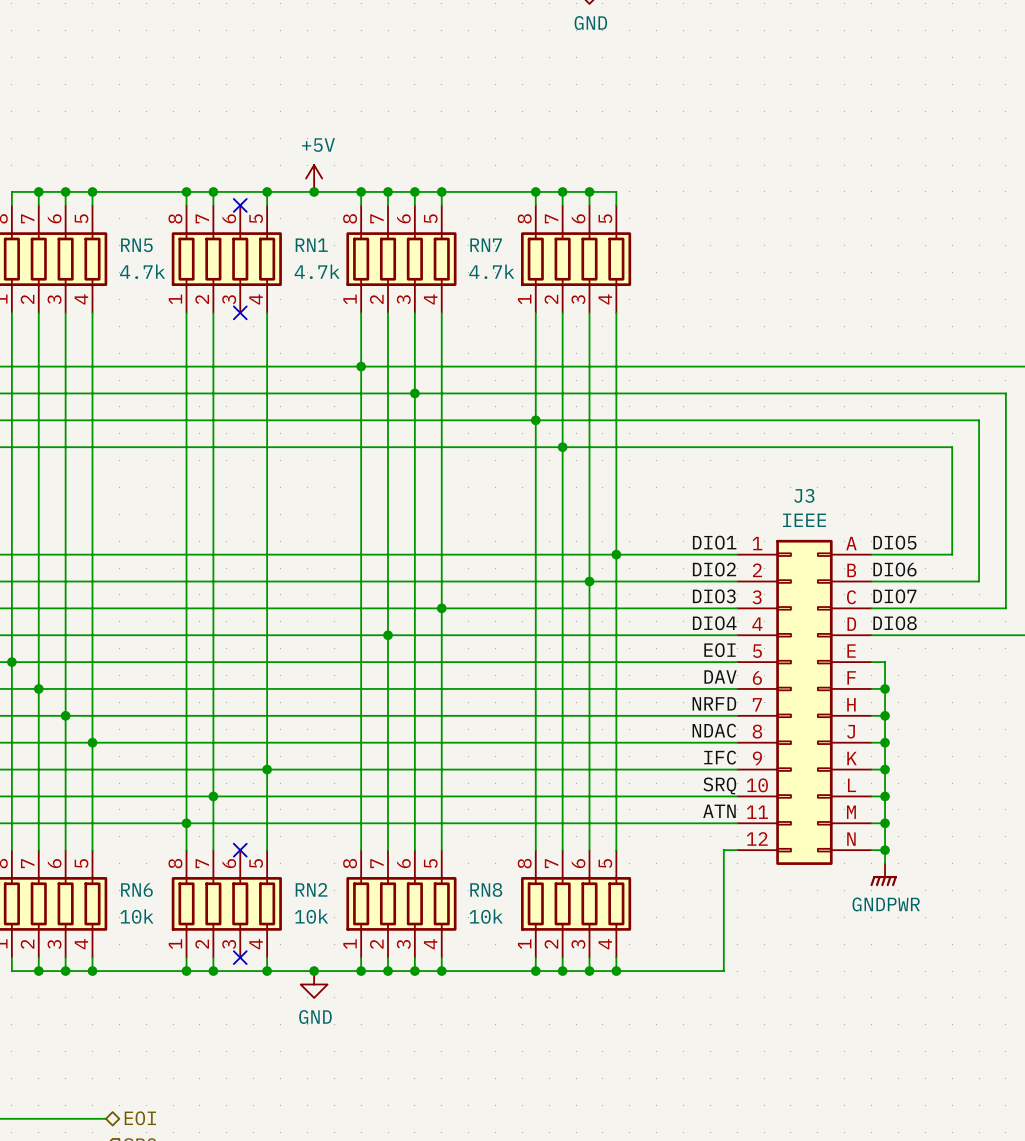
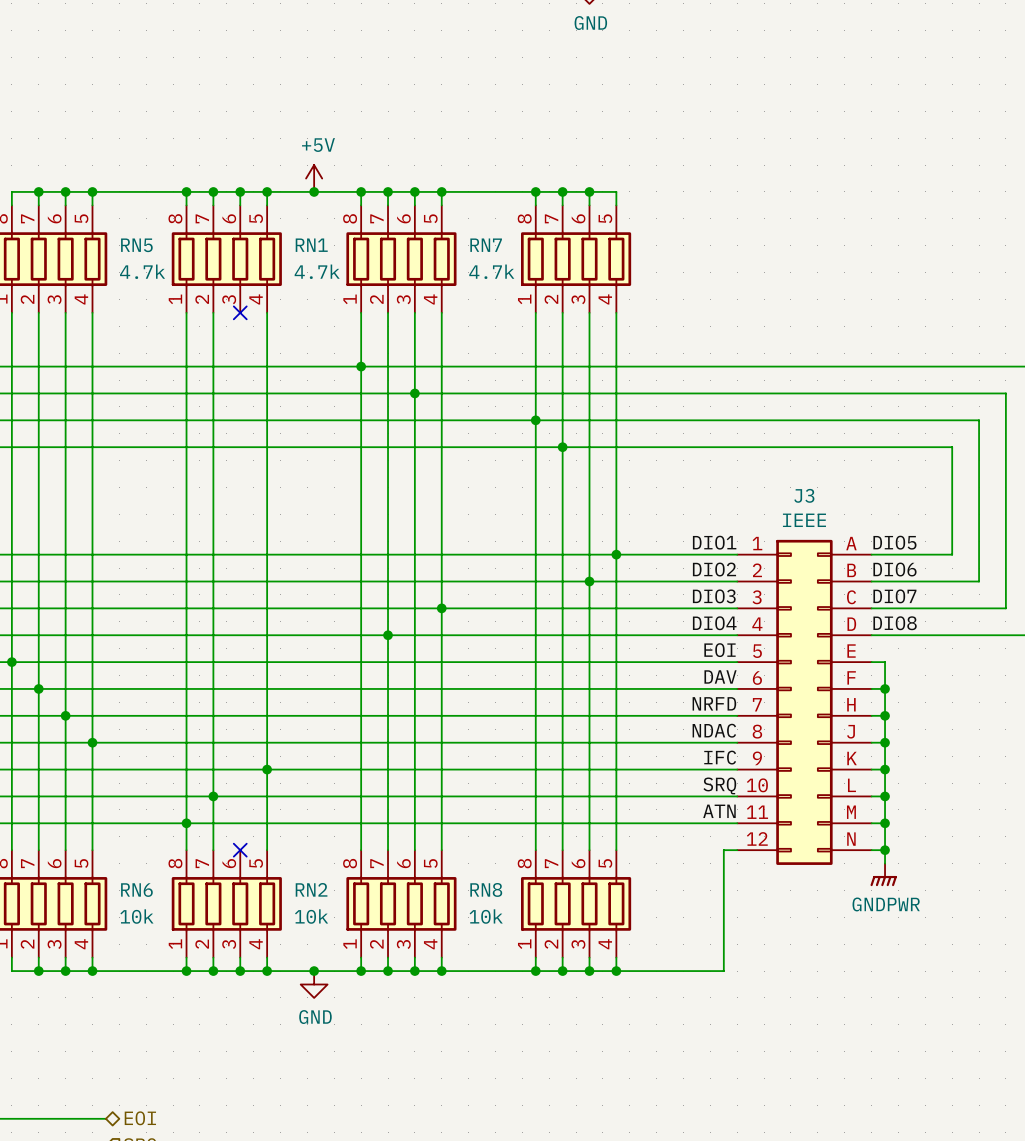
wire: none -> (240, 191) (240, 205)
junction: none -> (240, 191)
no-connect mark: (240, 205) -> none
wire: none -> (240, 957) (240, 971)
no-connect mark: (240, 957) -> none
junction: none -> (240, 971)

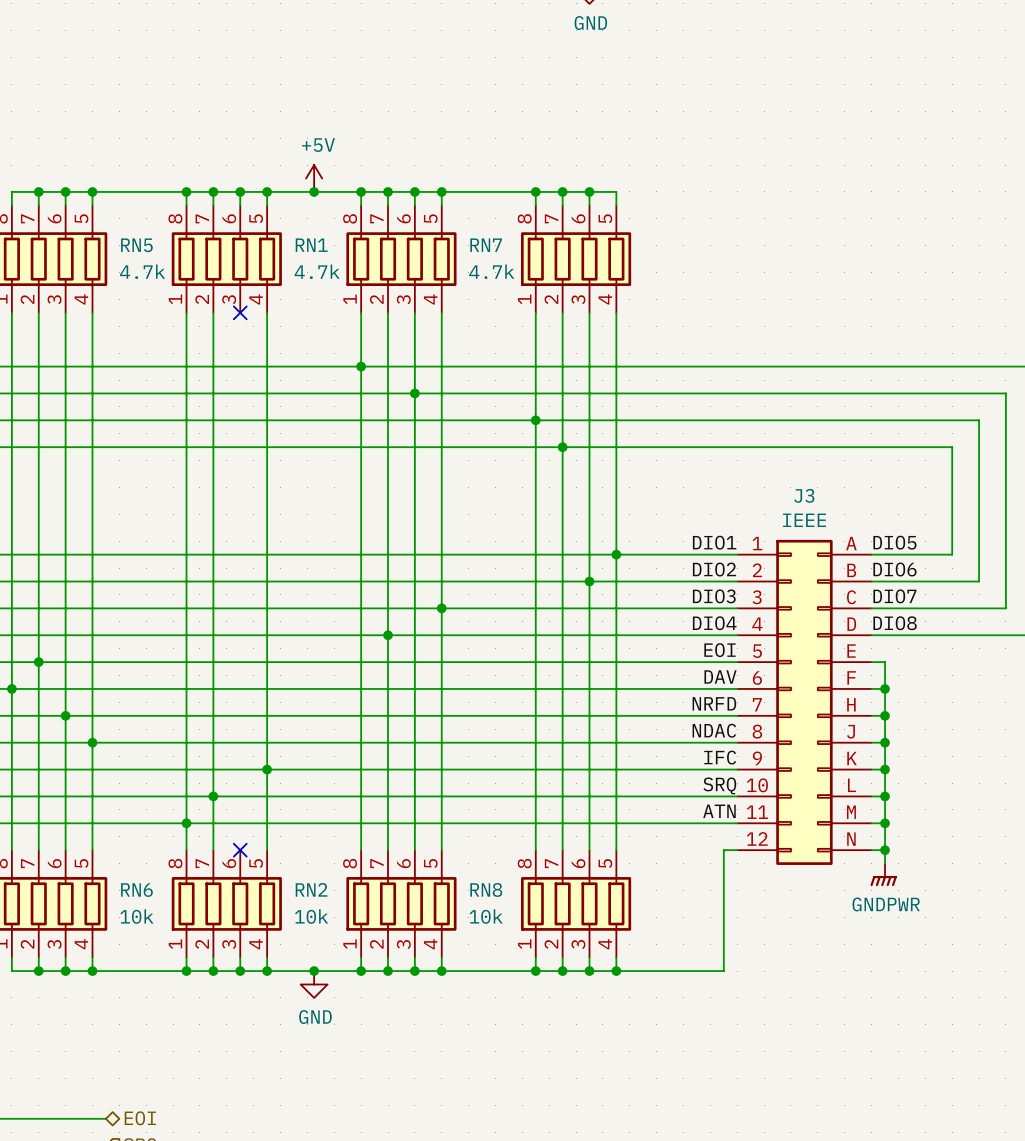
junction: (11, 662) -> none
junction: none -> (38, 662)
junction: none -> (11, 688)
junction: (38, 688) -> none

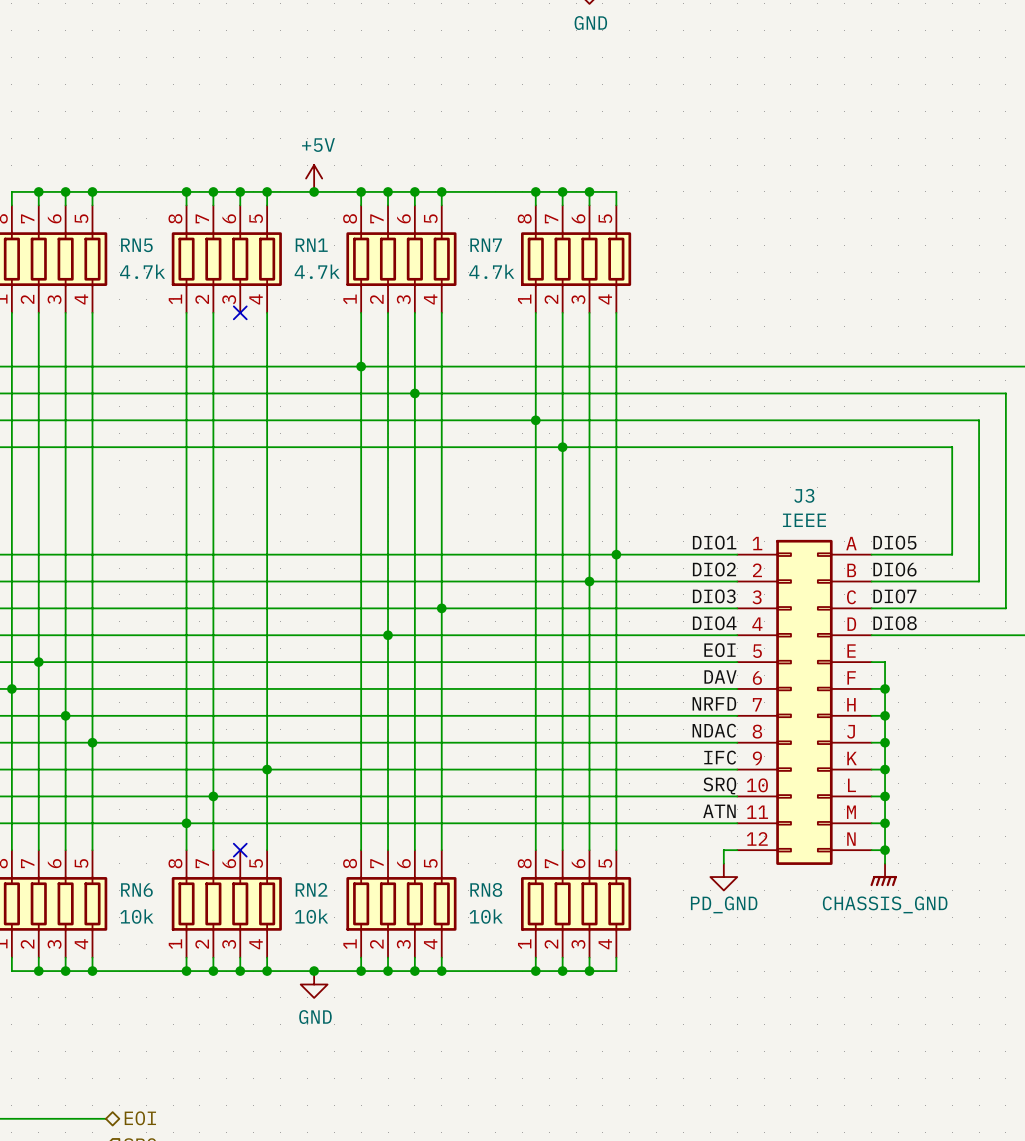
wire: (723, 863) (723, 971) (616, 971) -> none
power symbol: GNDPWR (883, 874) -> CHASSIS_GND (883, 874)
power symbol: none -> PD_GND (723, 877)
junction: (616, 971) -> none

